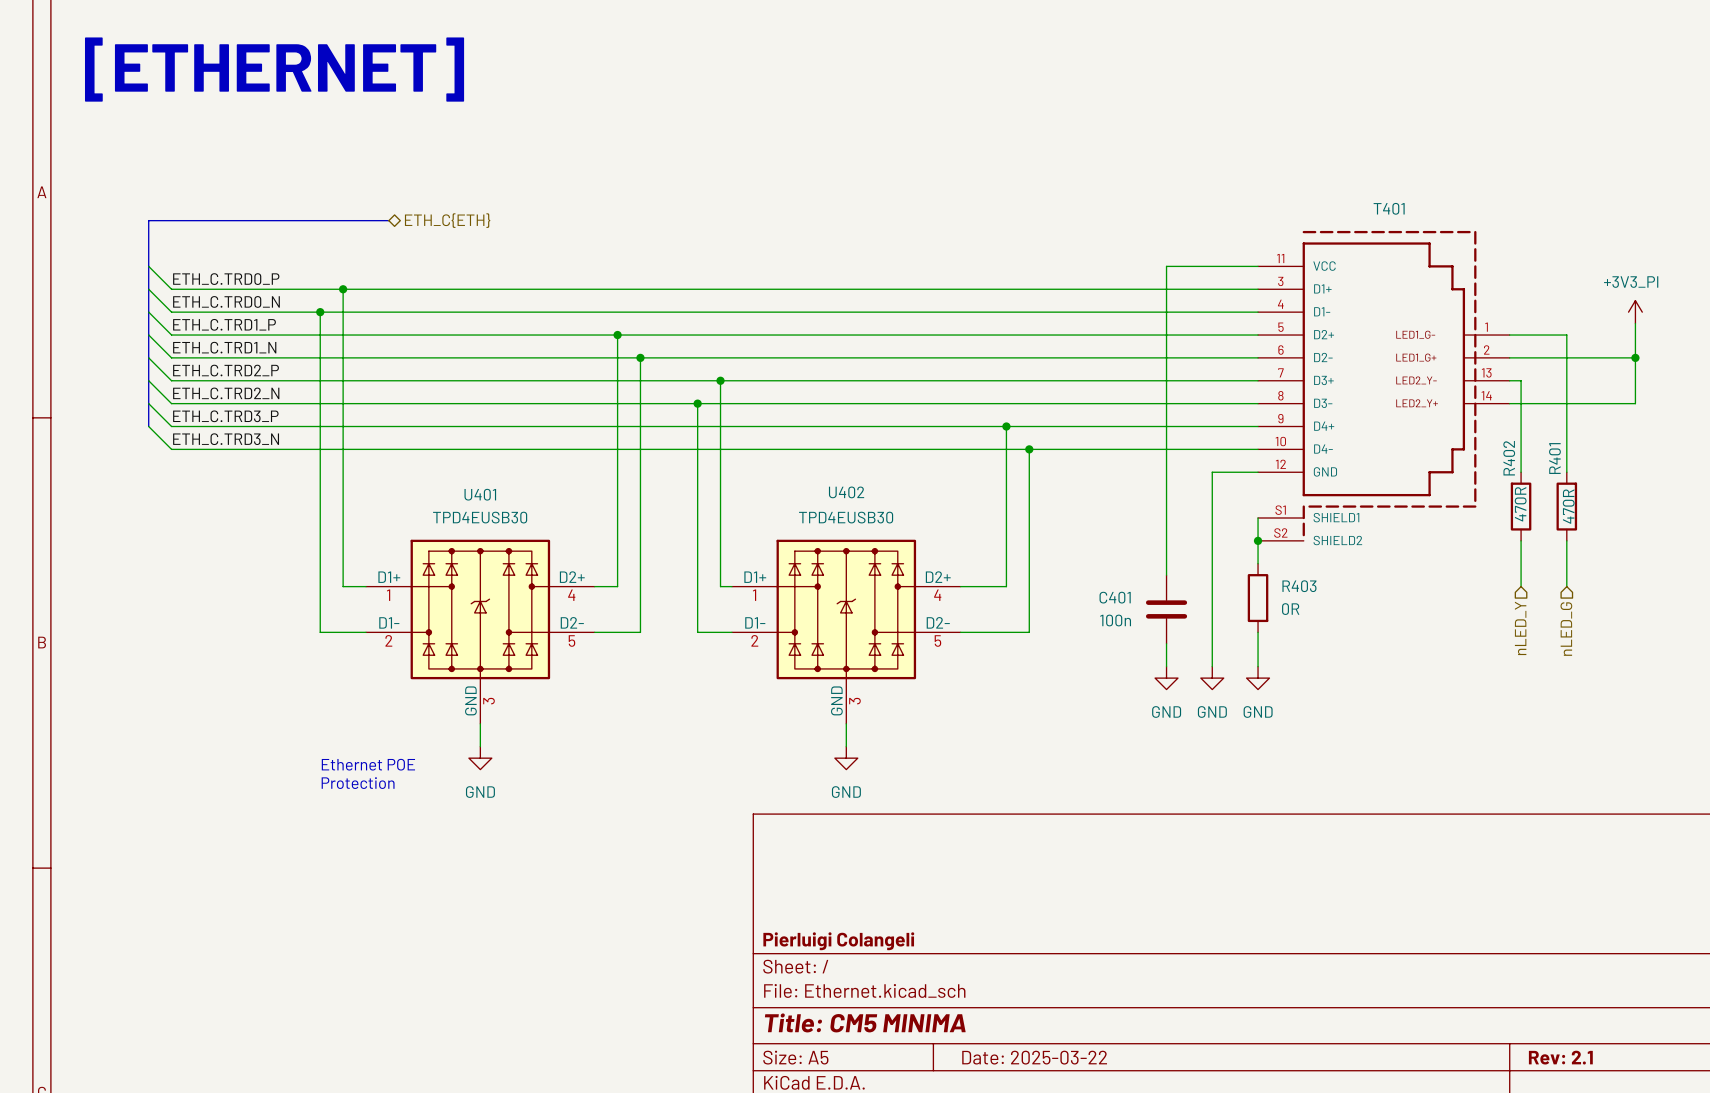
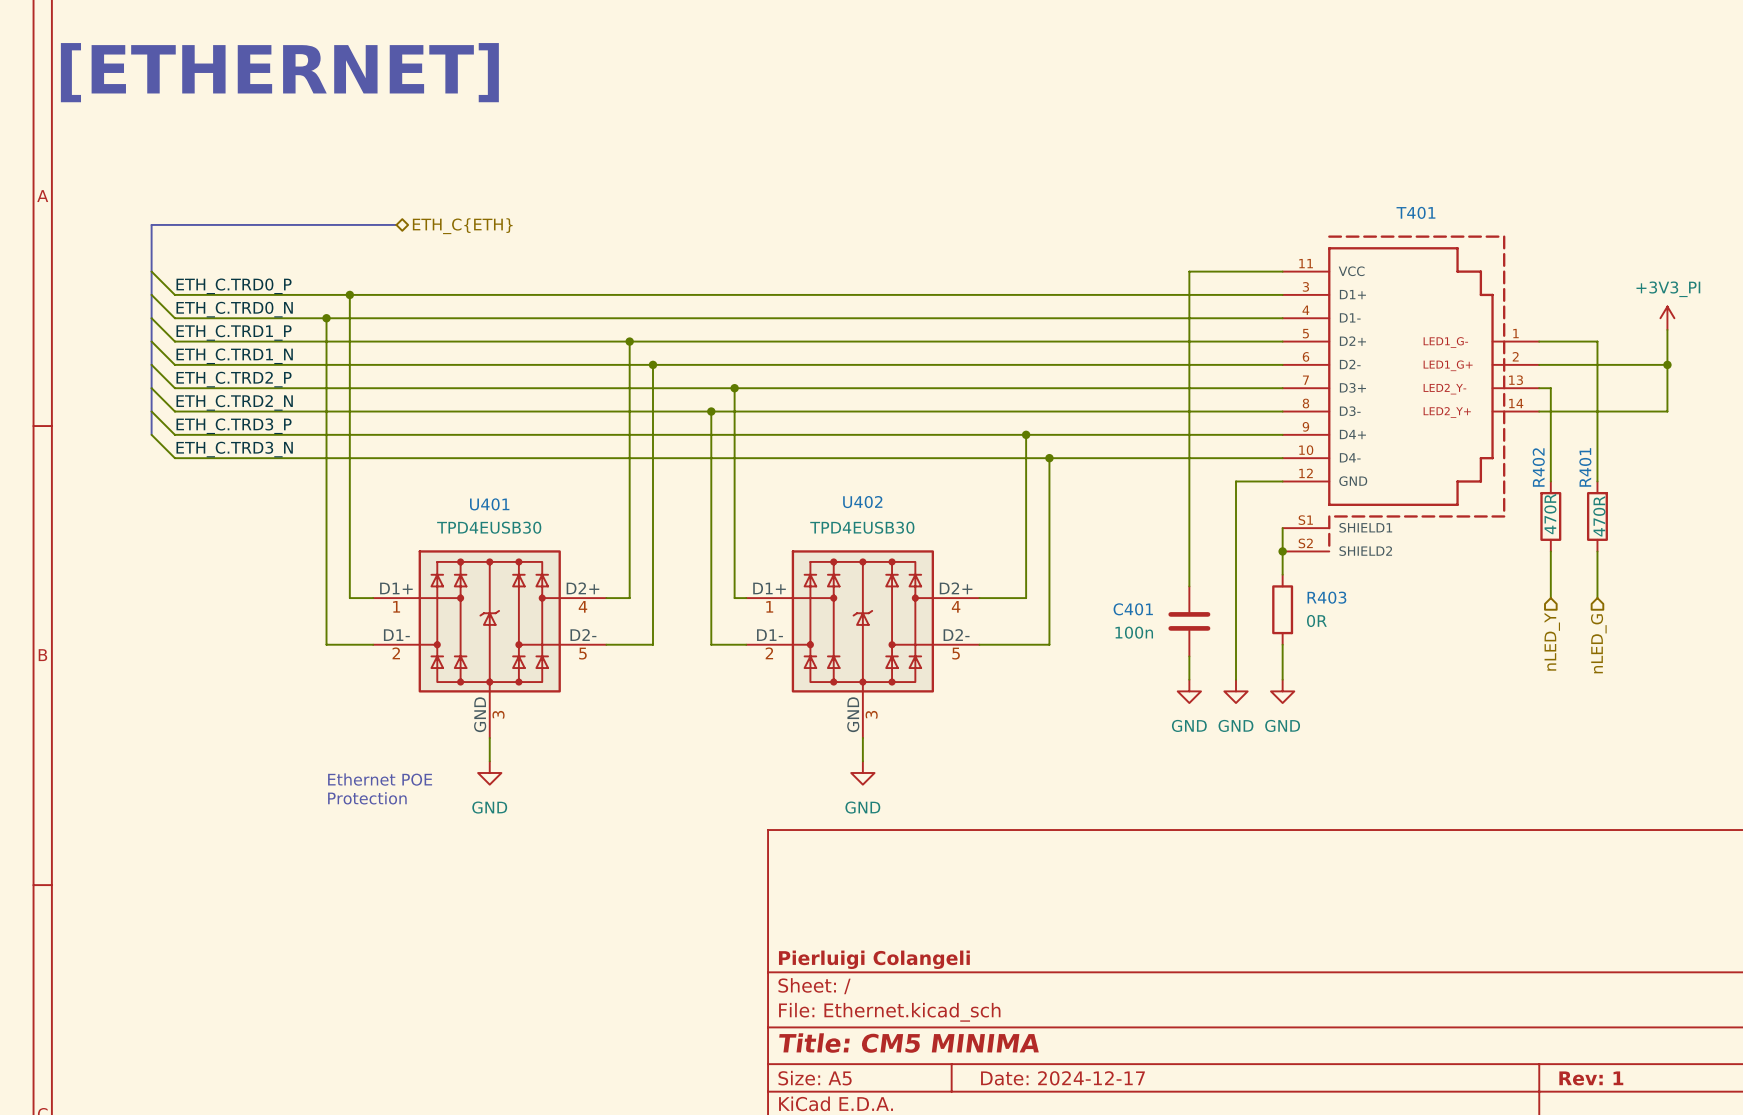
title block: Date: 2025-03-22 (1034, 1057) -> Date: 2024-12-17 (1062, 1078)
title block: Rev: 2.1 (1560, 1057) -> Rev: 1 (1591, 1078)

